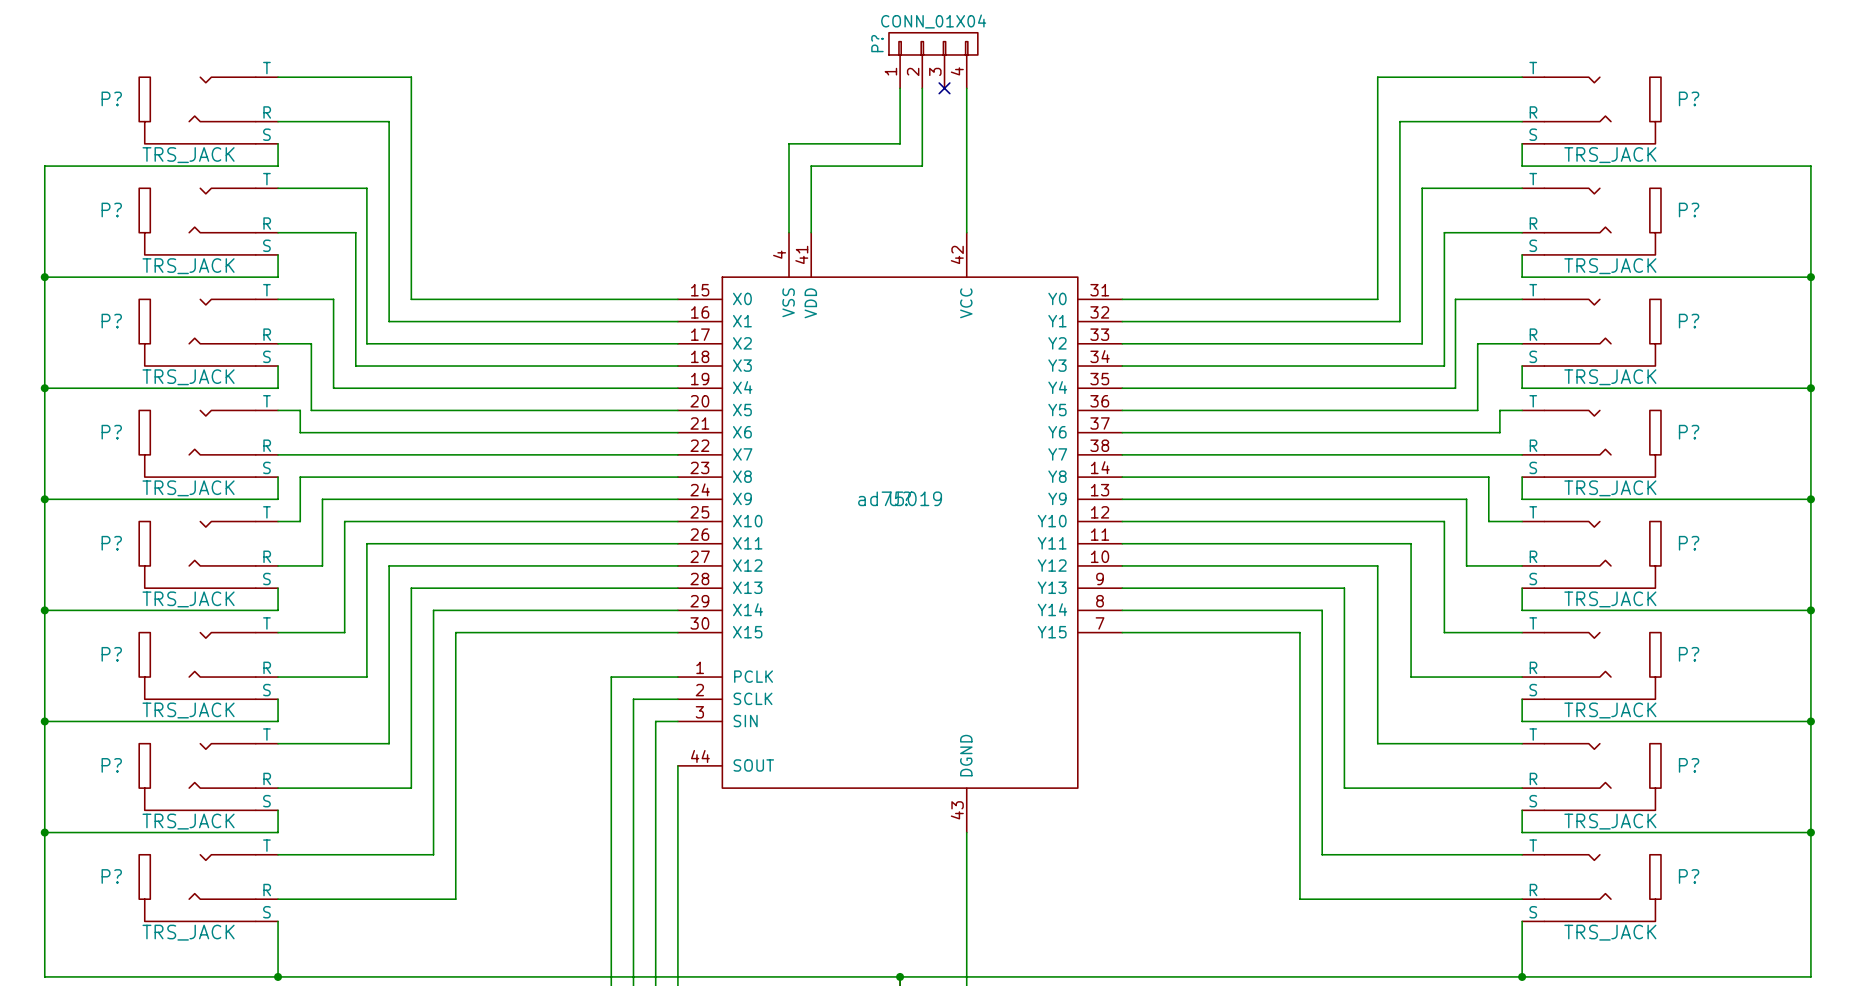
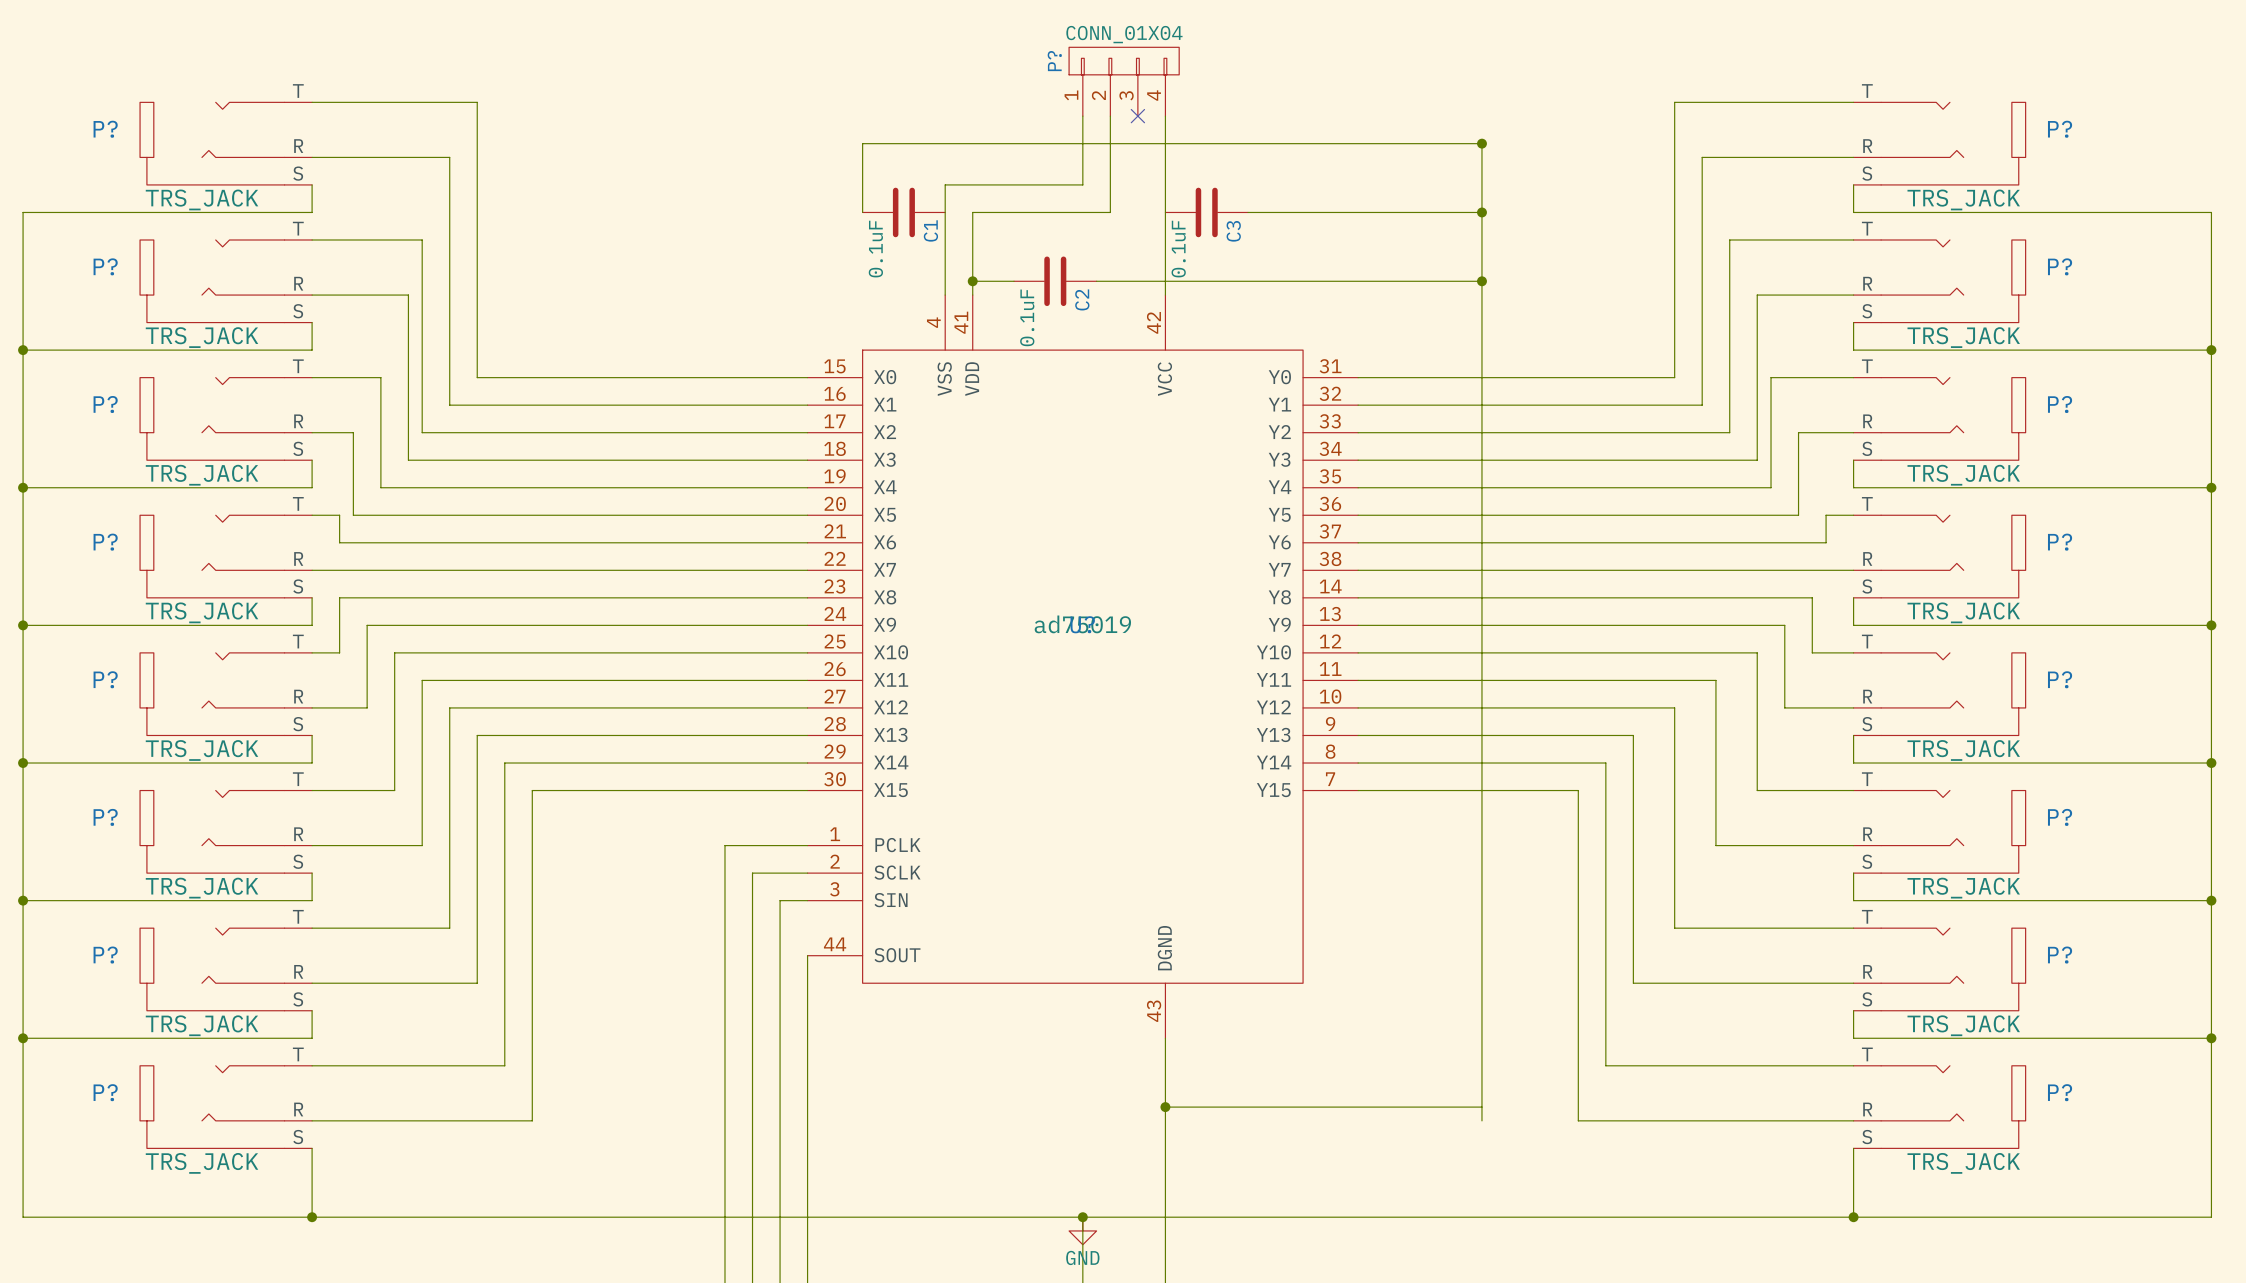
junction: none -> (1481, 143)
wire: none -> (862, 212) (862, 143) (1481, 143) (1481, 1120)
C1: none -> 0.1uF (903, 212)
C3: none -> 0.1uF (1206, 212)
wire: none -> (1248, 212) (1481, 212)
junction: none -> (1481, 212)
wire: none -> (972, 281) (1014, 281)
junction: none -> (972, 281)
C2: none -> 0.1uF (1055, 281)
wire: none -> (1096, 281) (1481, 281)
junction: none -> (1481, 281)
wire: none -> (1165, 1107) (1481, 1107)
junction: none -> (1165, 1107)

